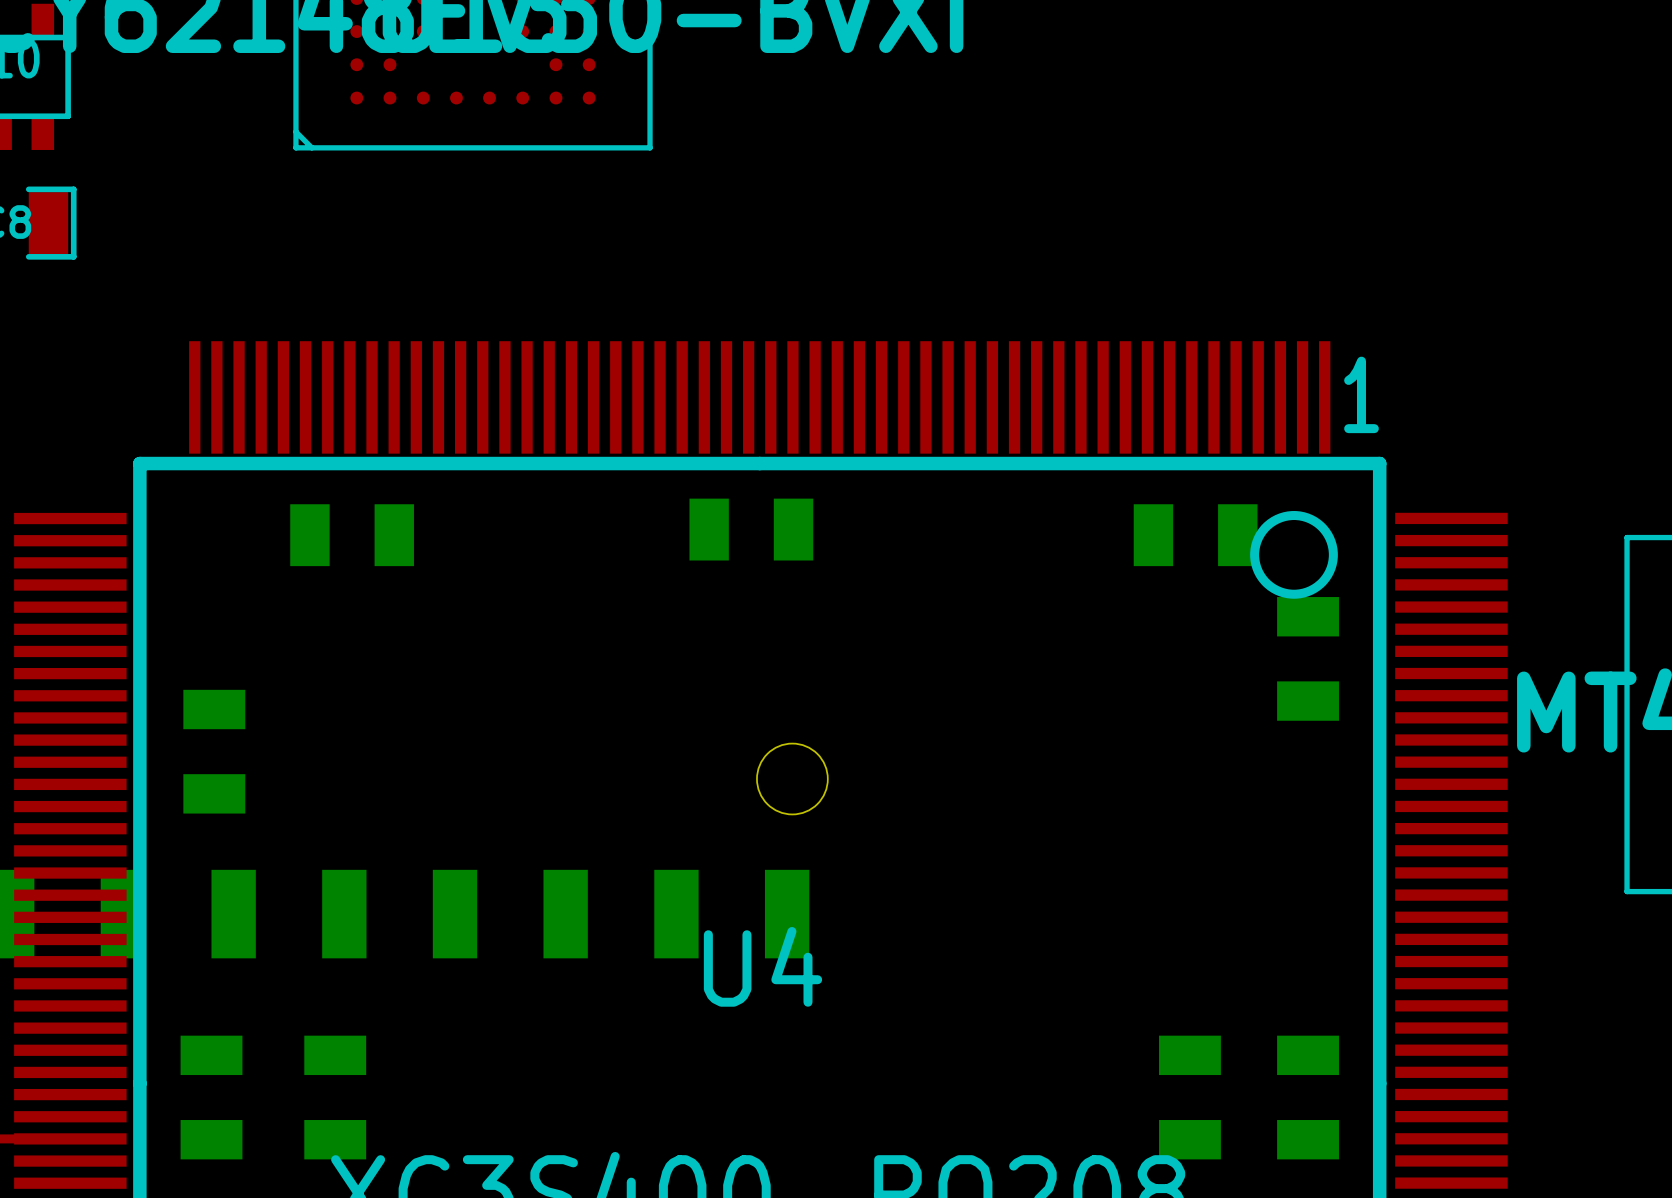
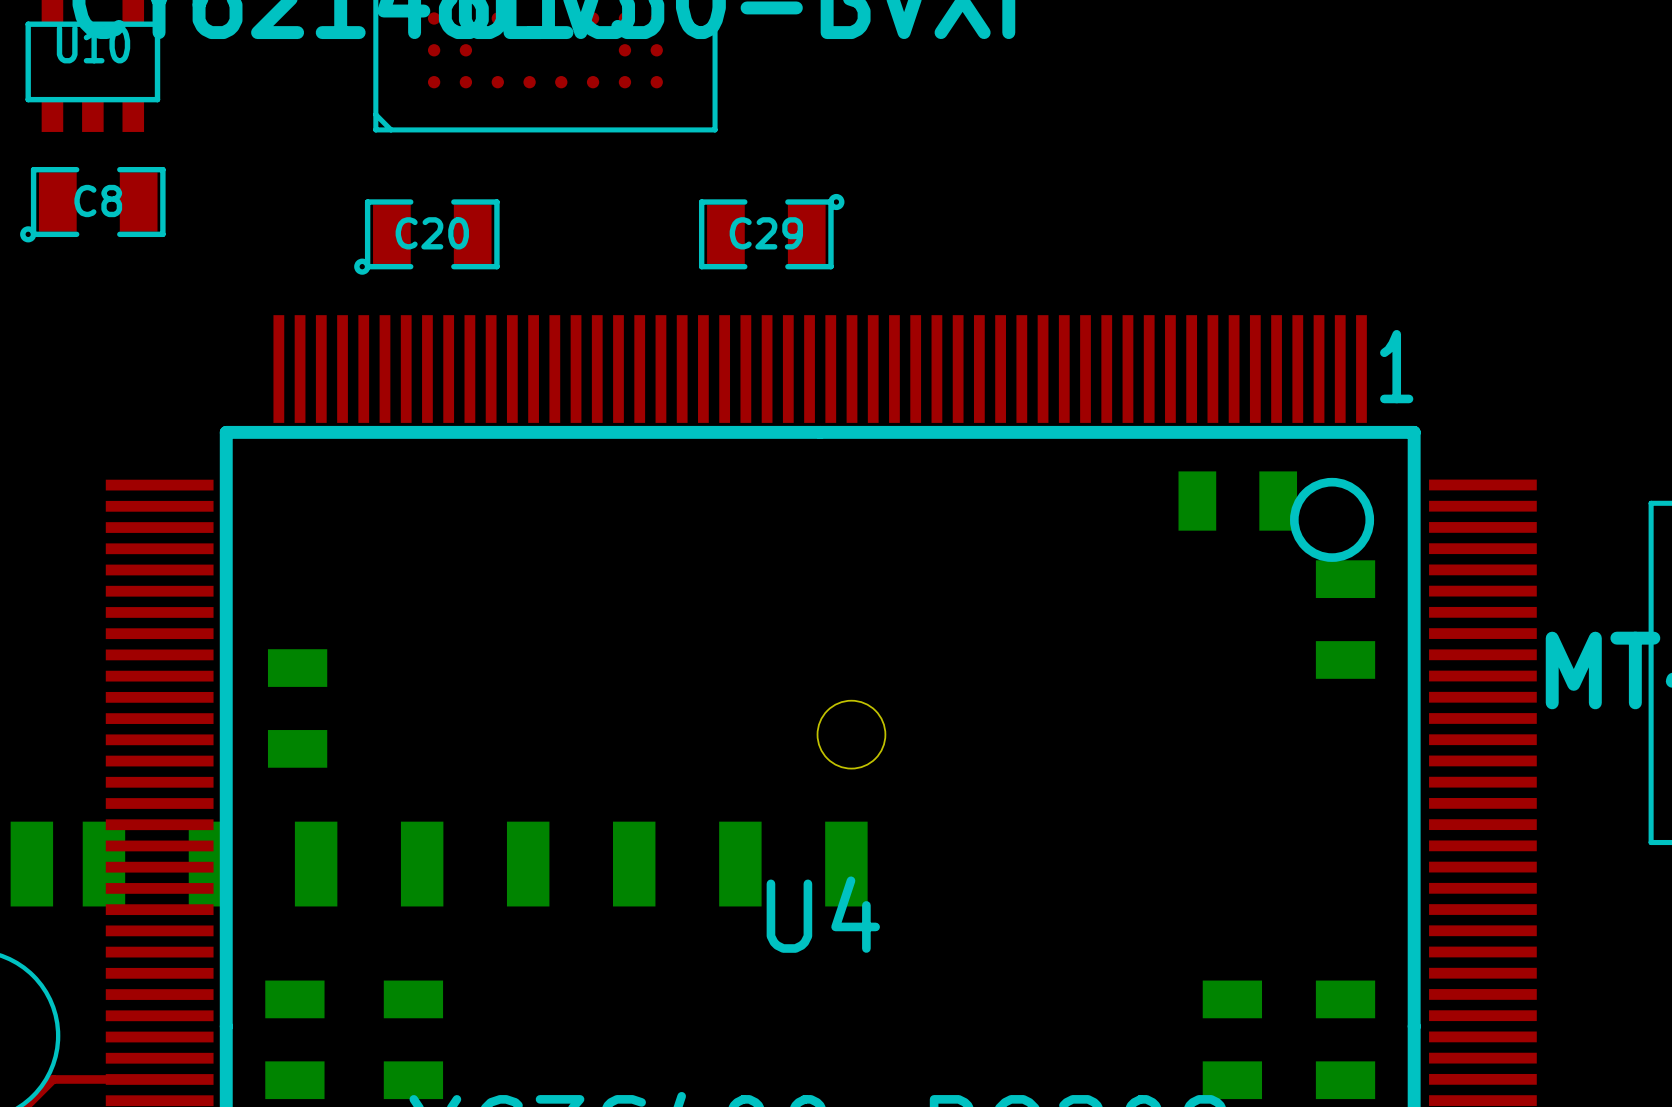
C29 side: bottom (751, 529) -> top (771, 231)
C20 side: bottom (352, 535) -> top (426, 237)

